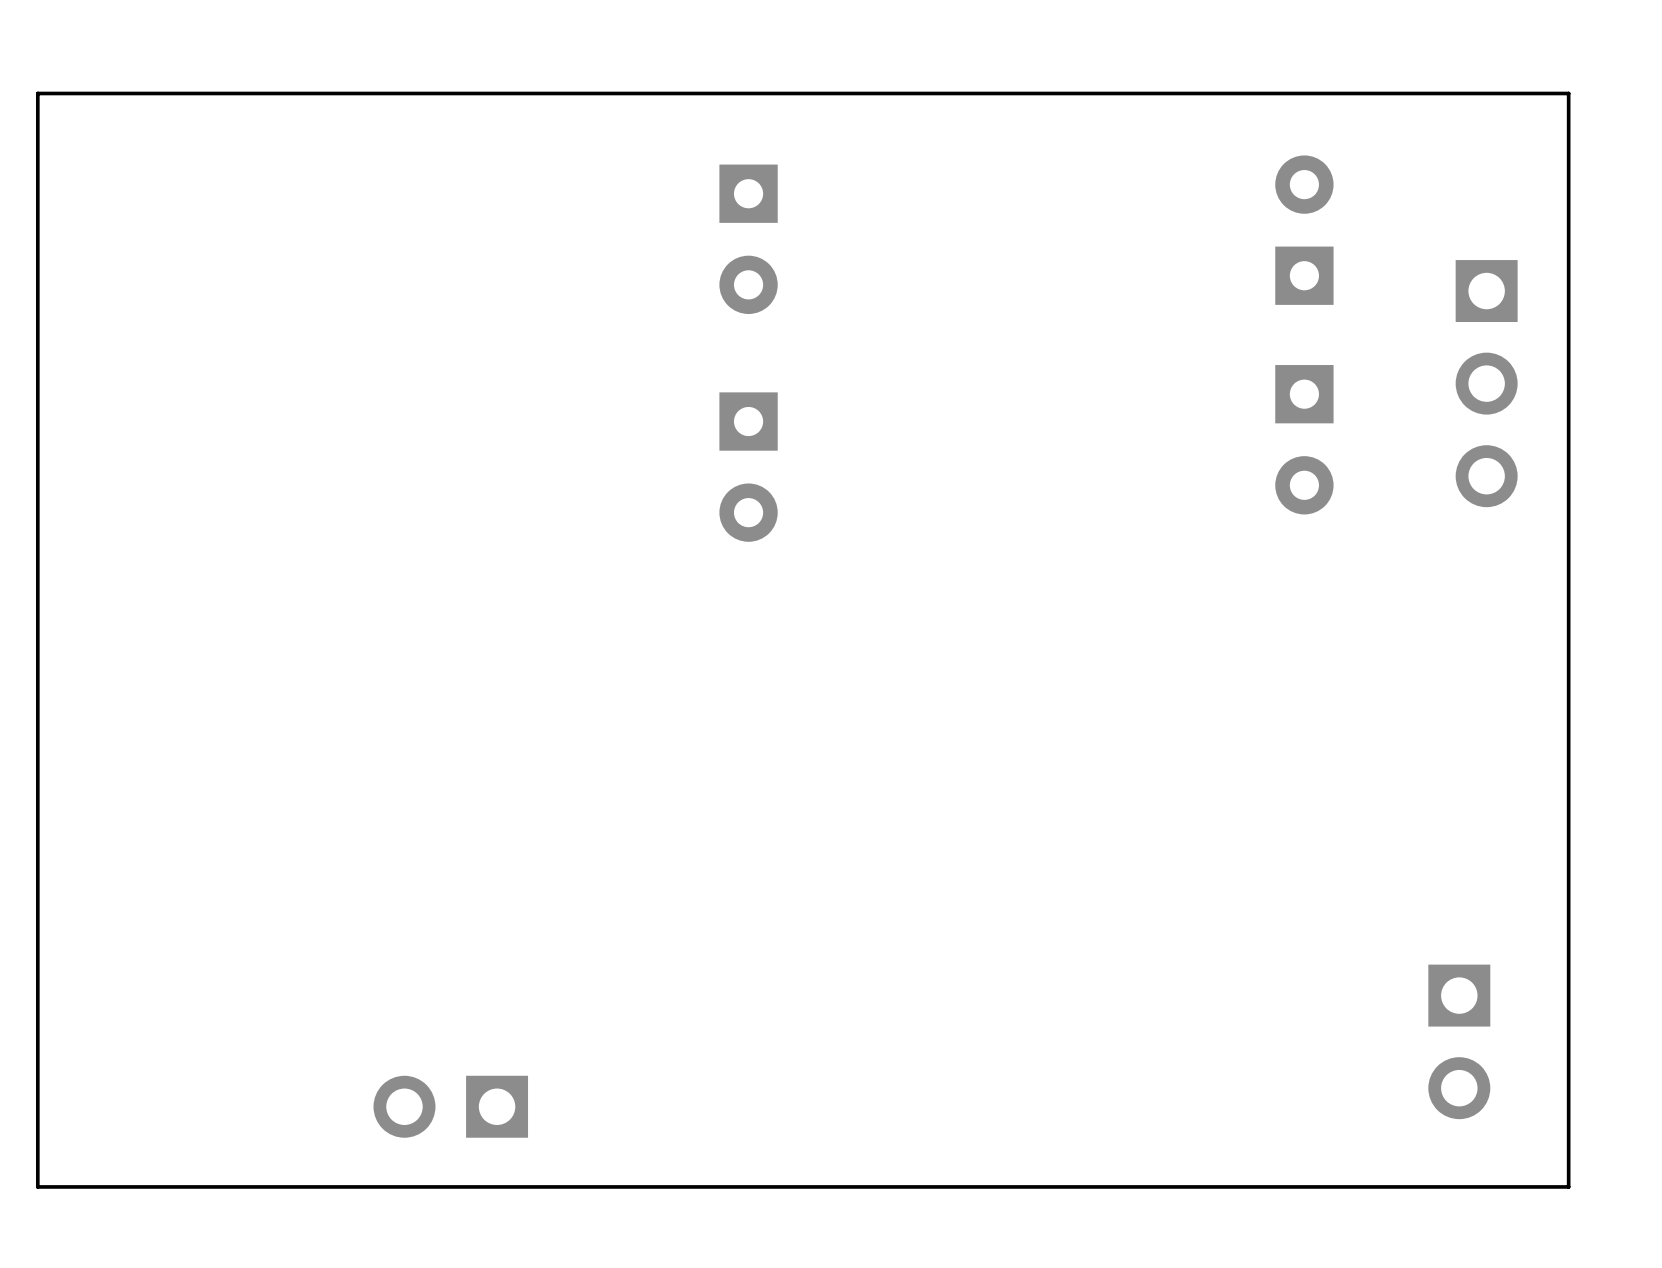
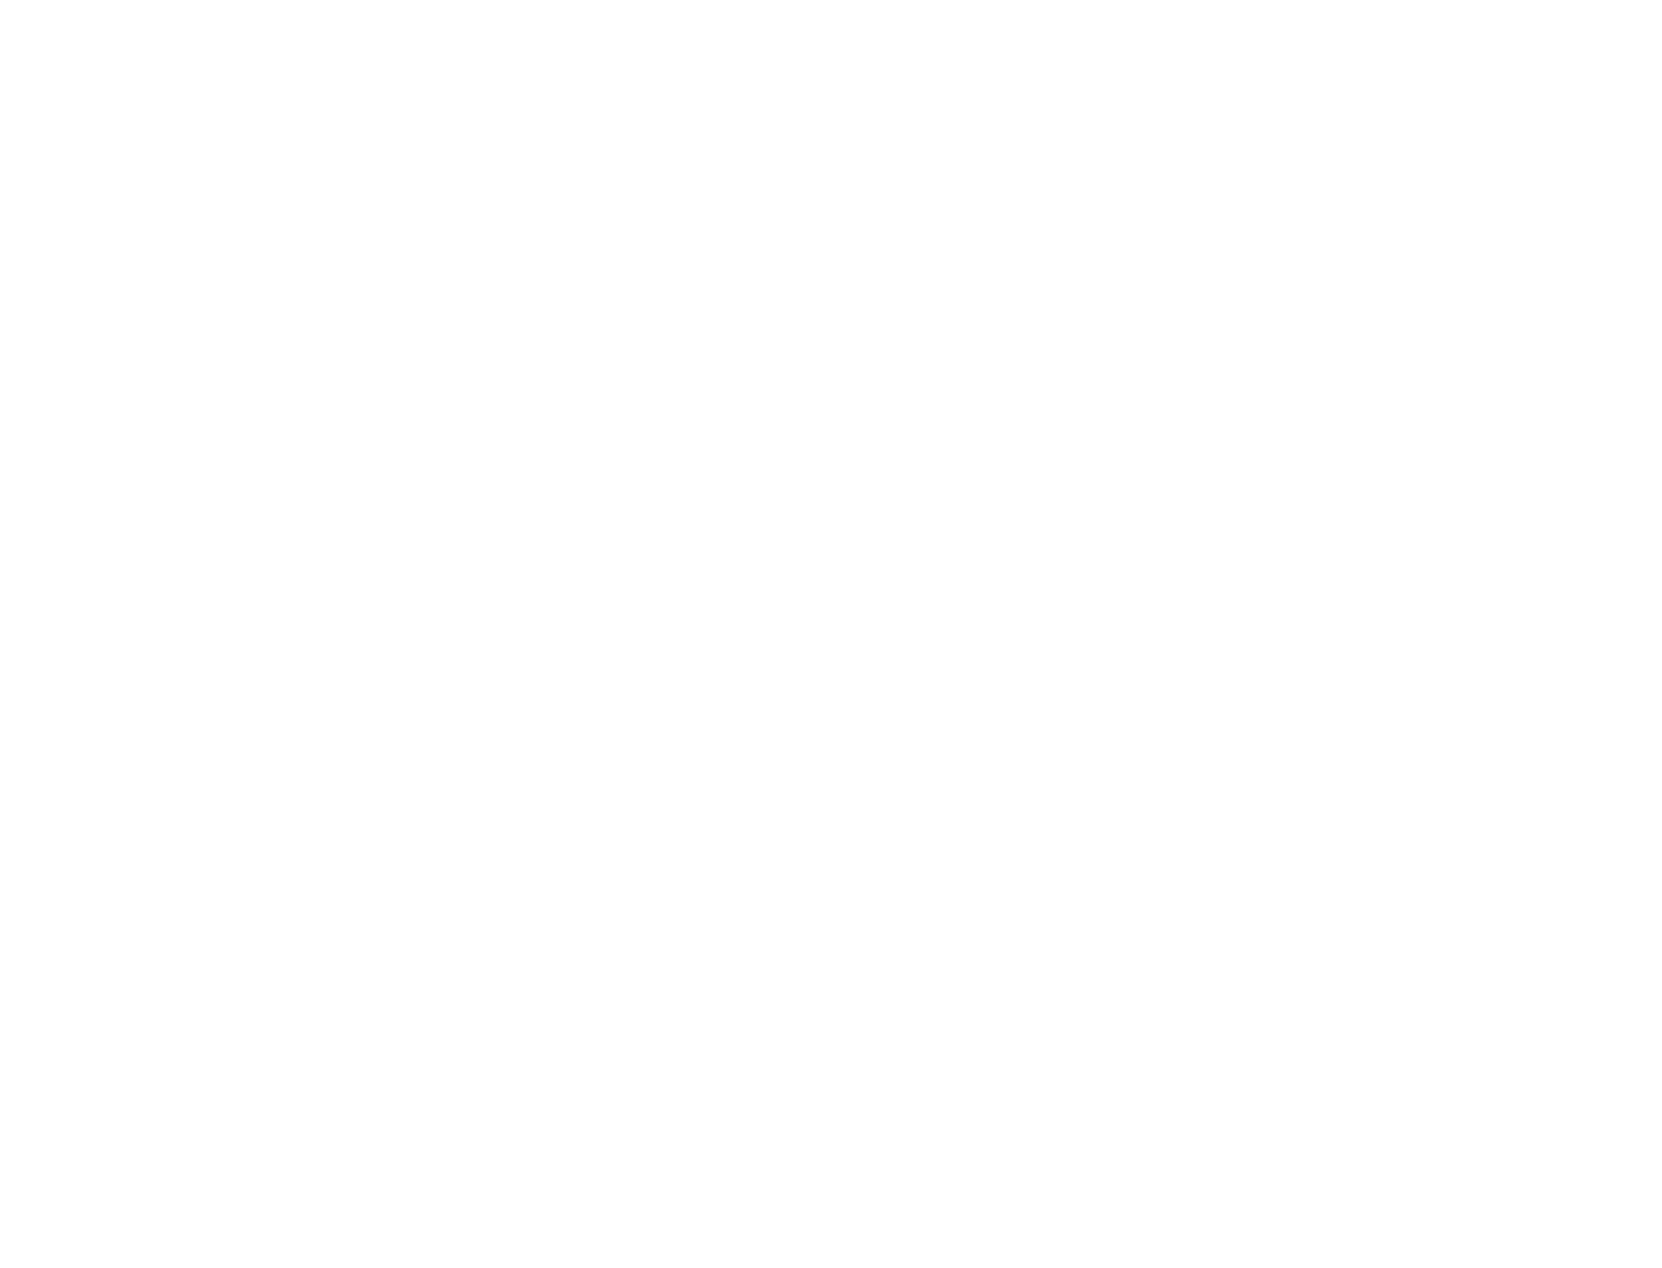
board edge: (1568, 93) (37, 93) (37, 1186) (1568, 1186) (1568, 93) -> none
part: (1304, 230) -> none
part: (748, 239) -> none
part: (1486, 383) -> none
part: (1304, 439) -> none
part: (748, 467) -> none
part: (1459, 1041) -> none
part: (450, 1106) -> none

